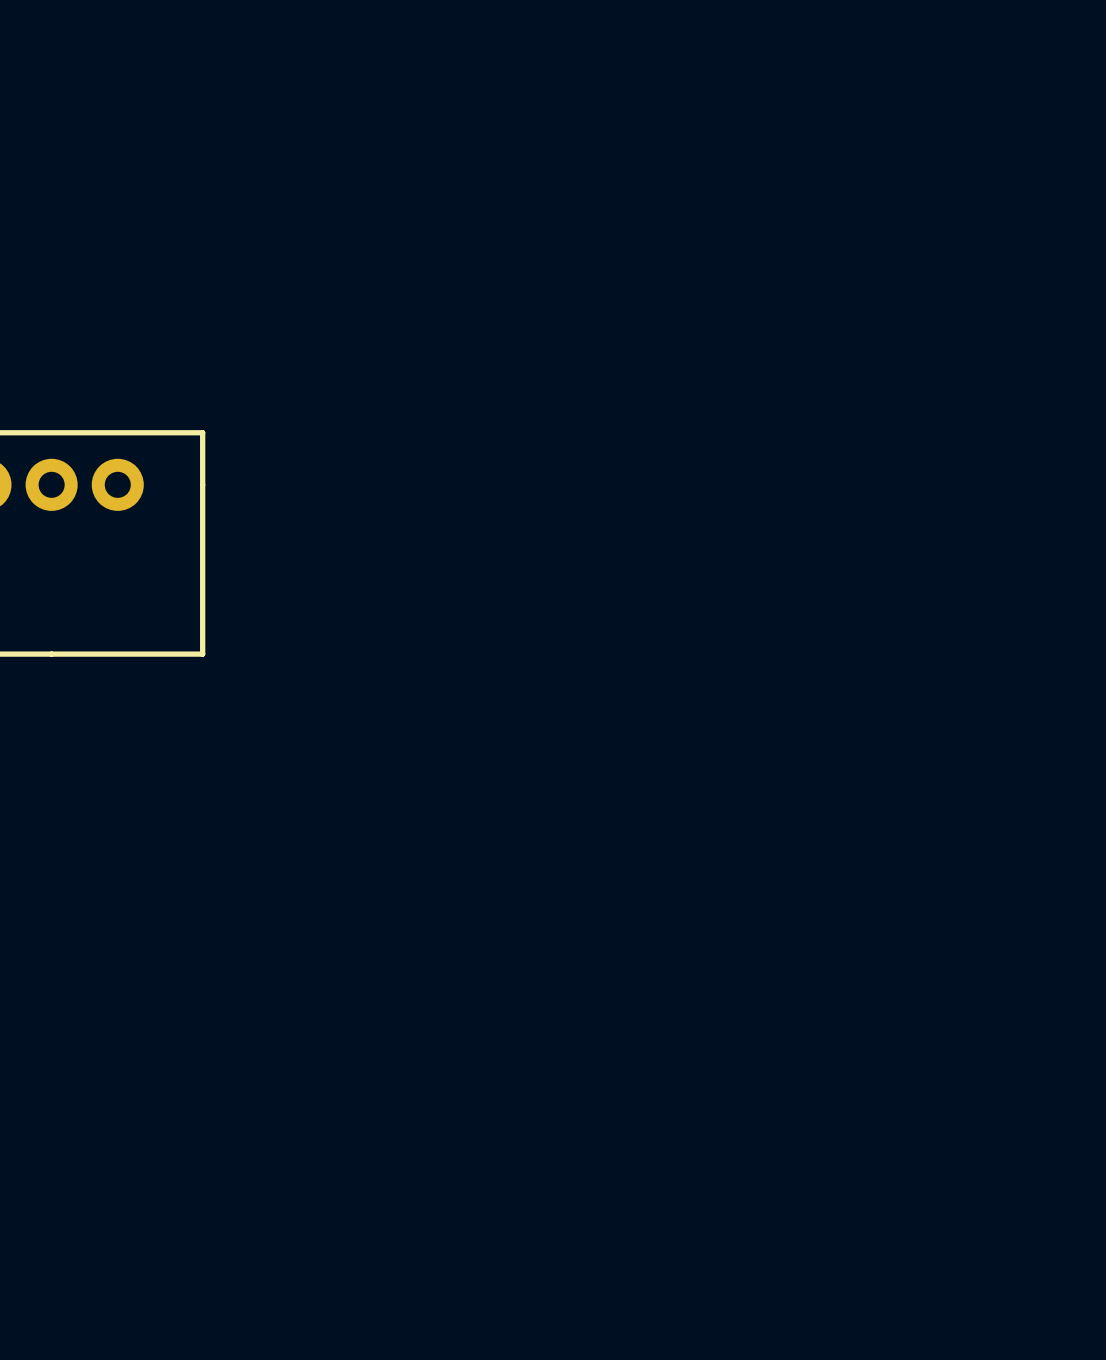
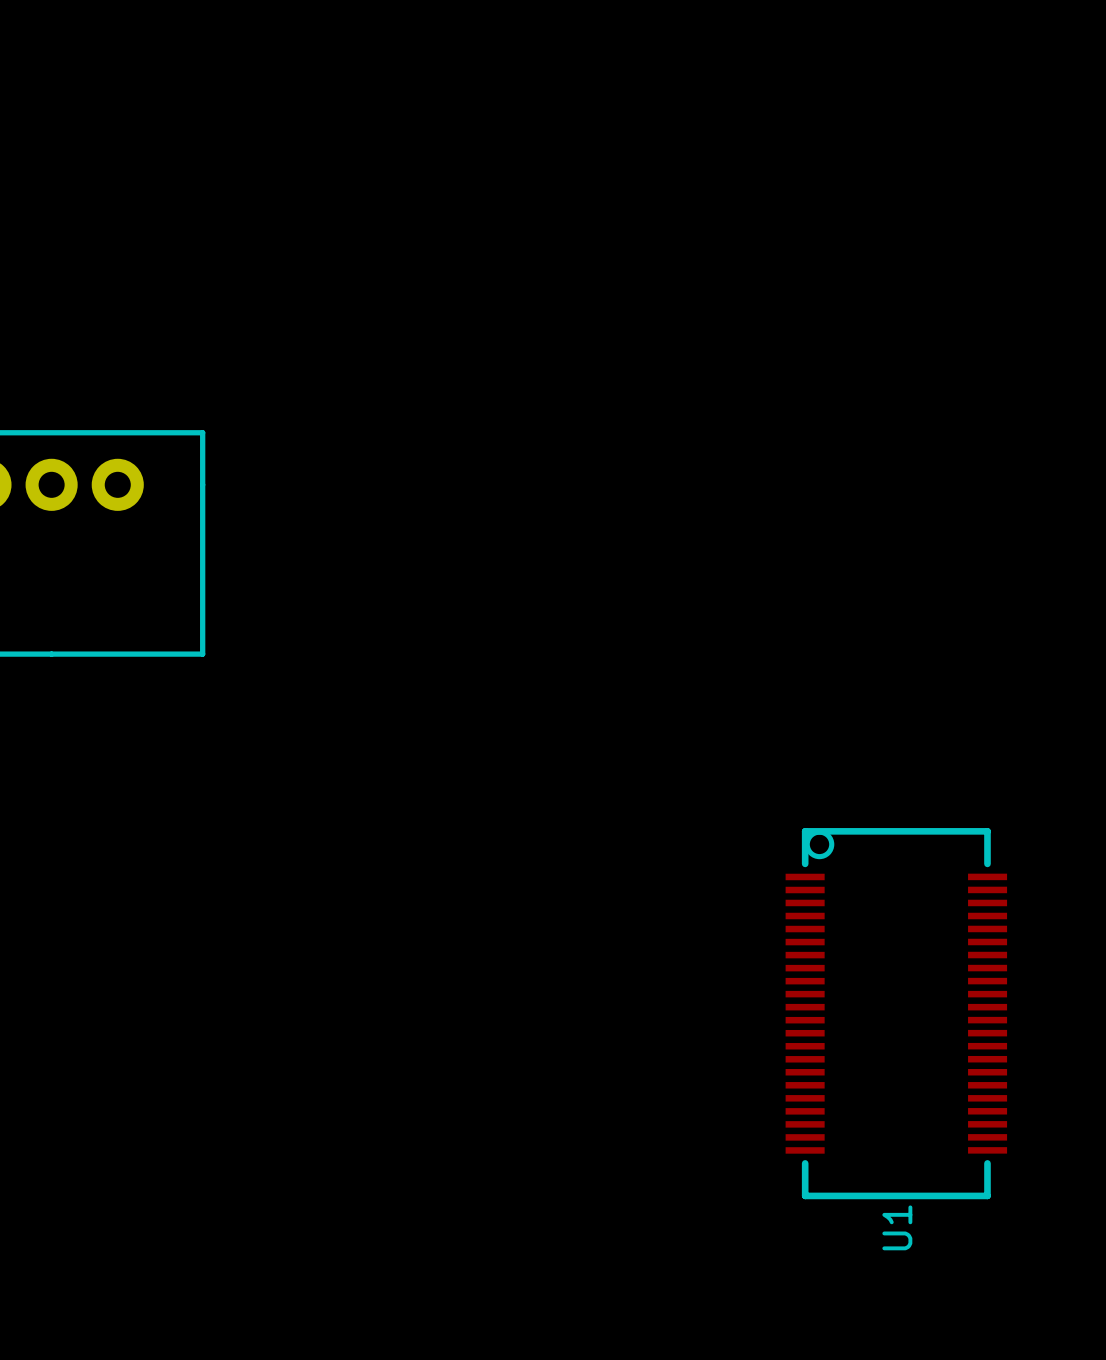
U1: none -> (896, 1013)

